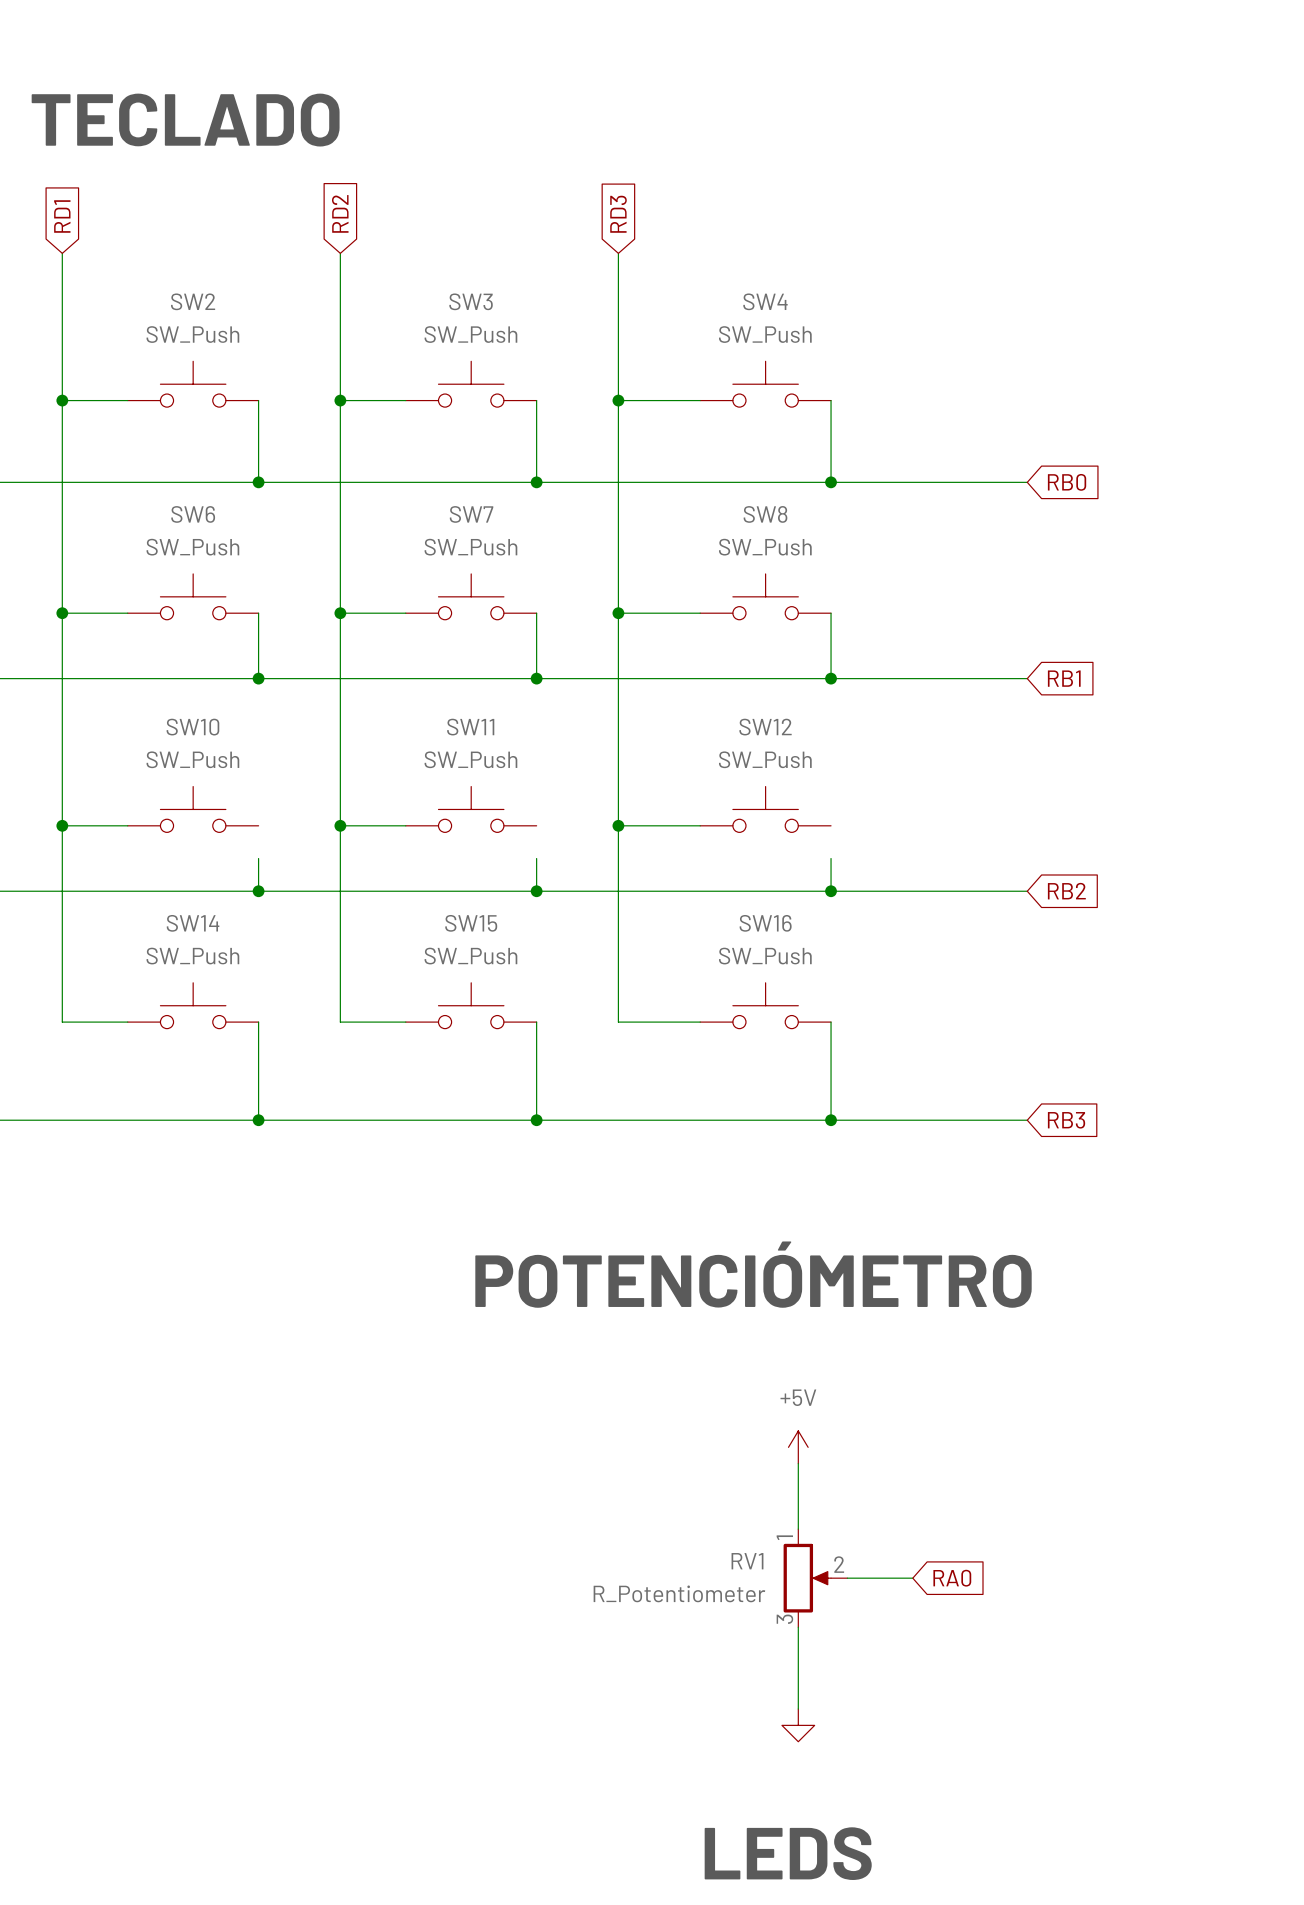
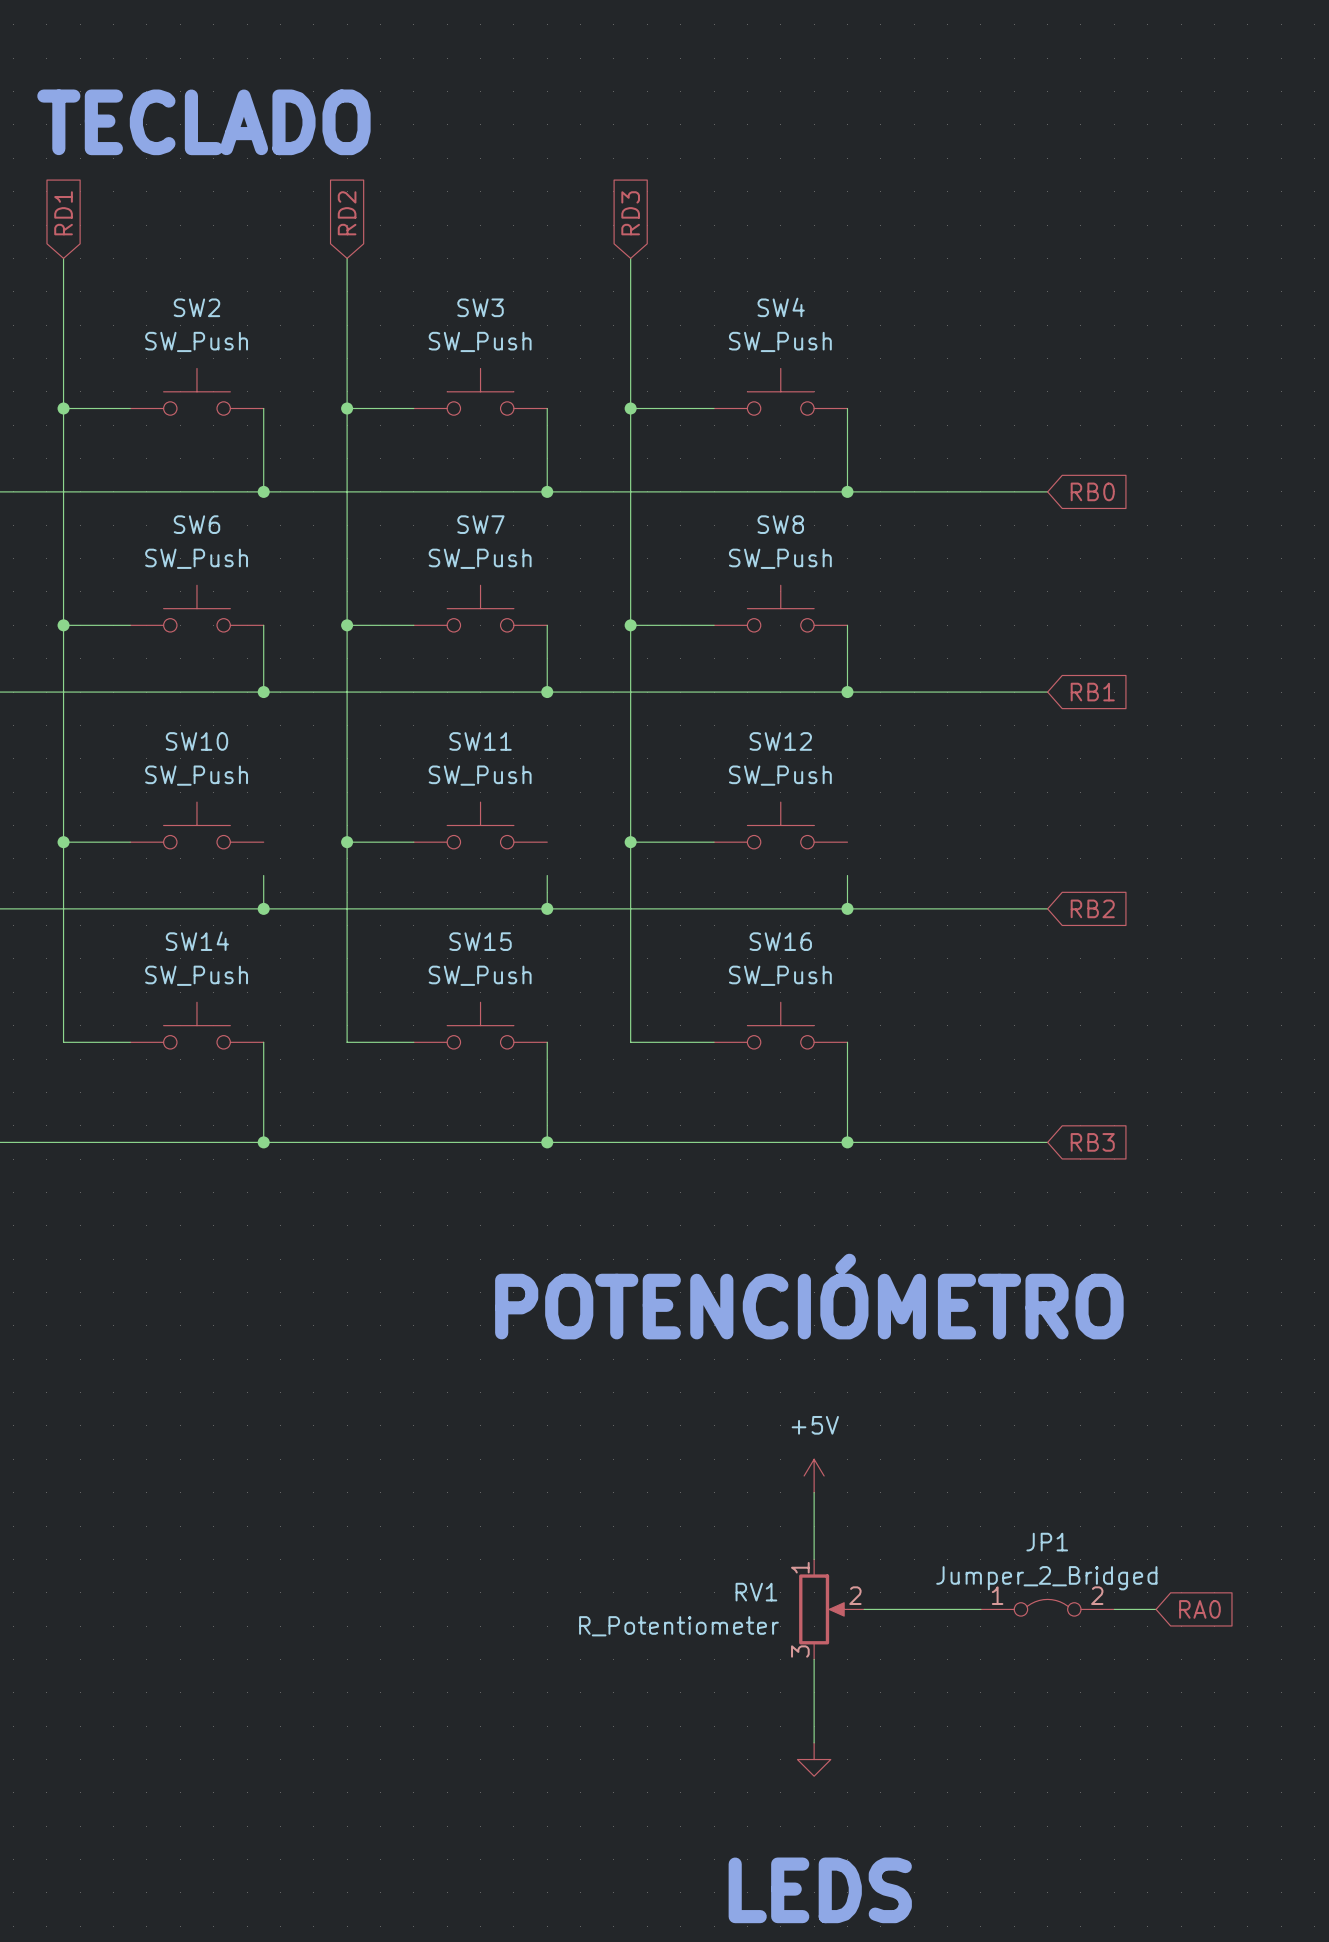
JP1: none -> Jumper_2_Bridged (1047, 1607)
wire: none -> (930, 1609) (980, 1609)
global label position: RA0 (952, 1578) -> RA0 (1199, 1609)
wire: none -> (1114, 1609) (1156, 1609)

